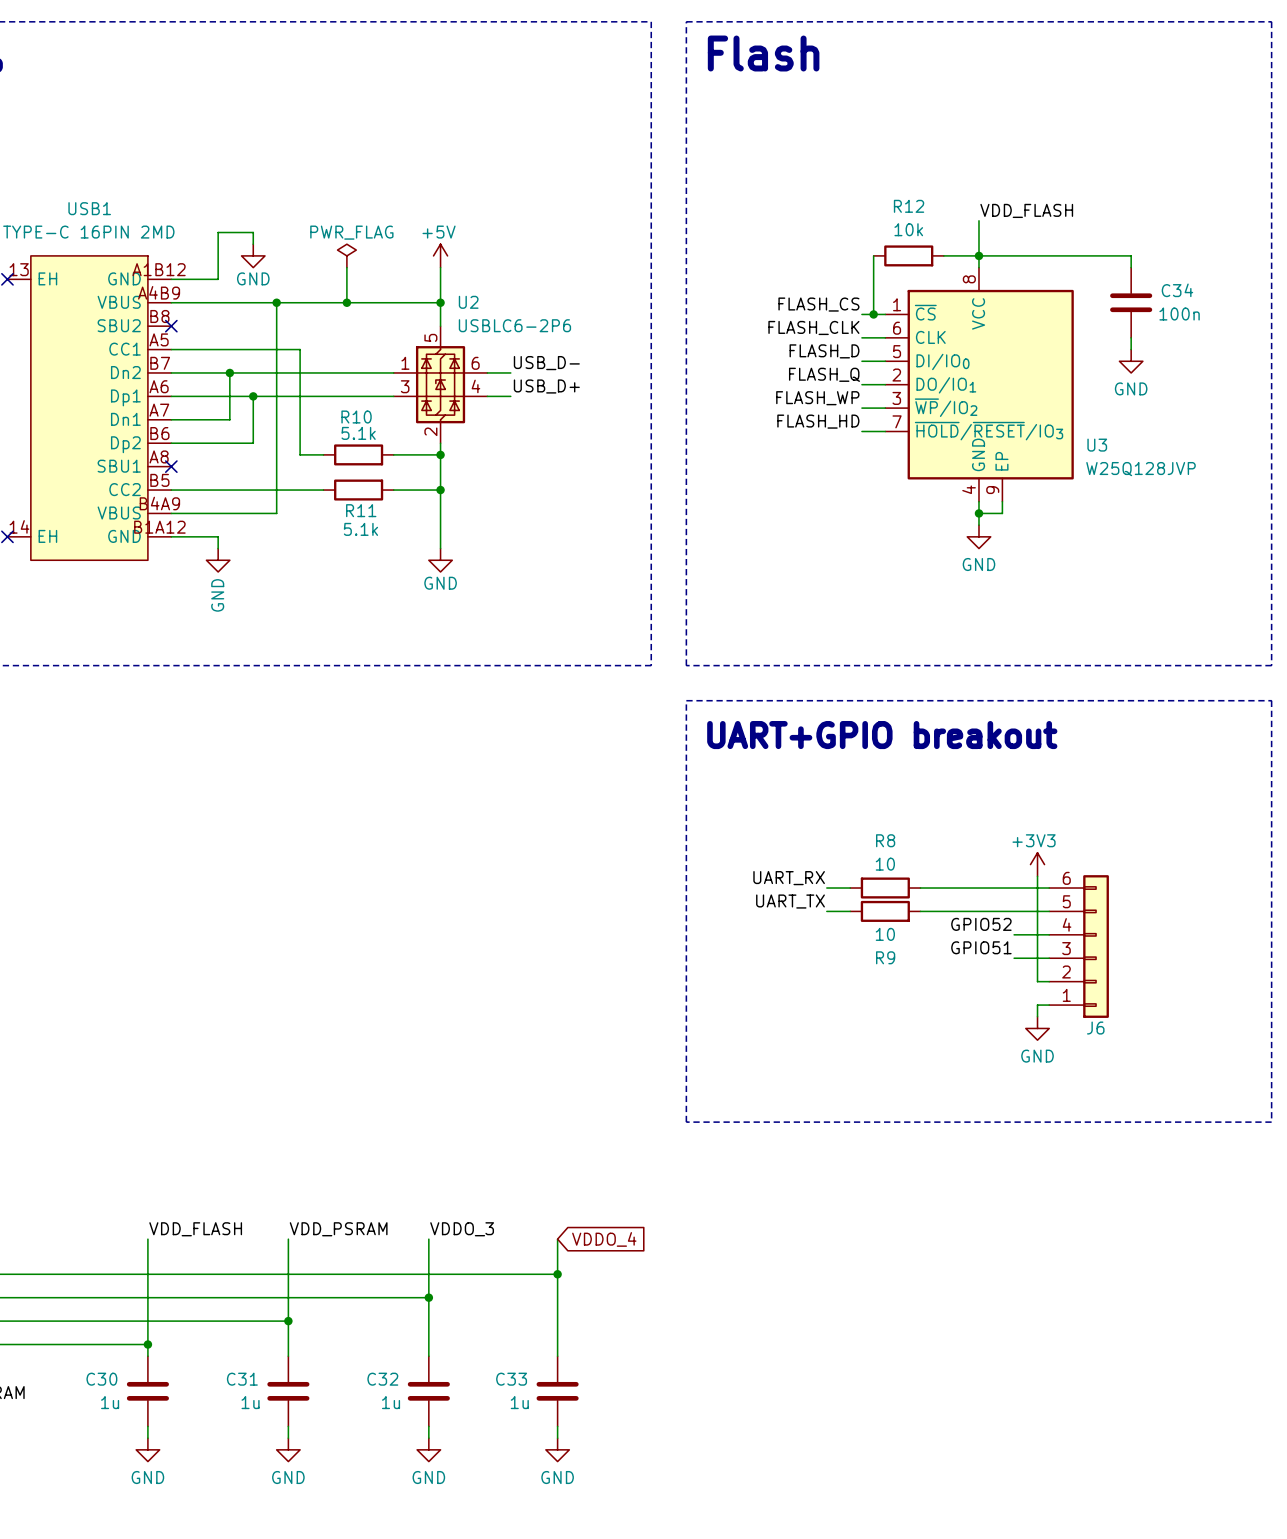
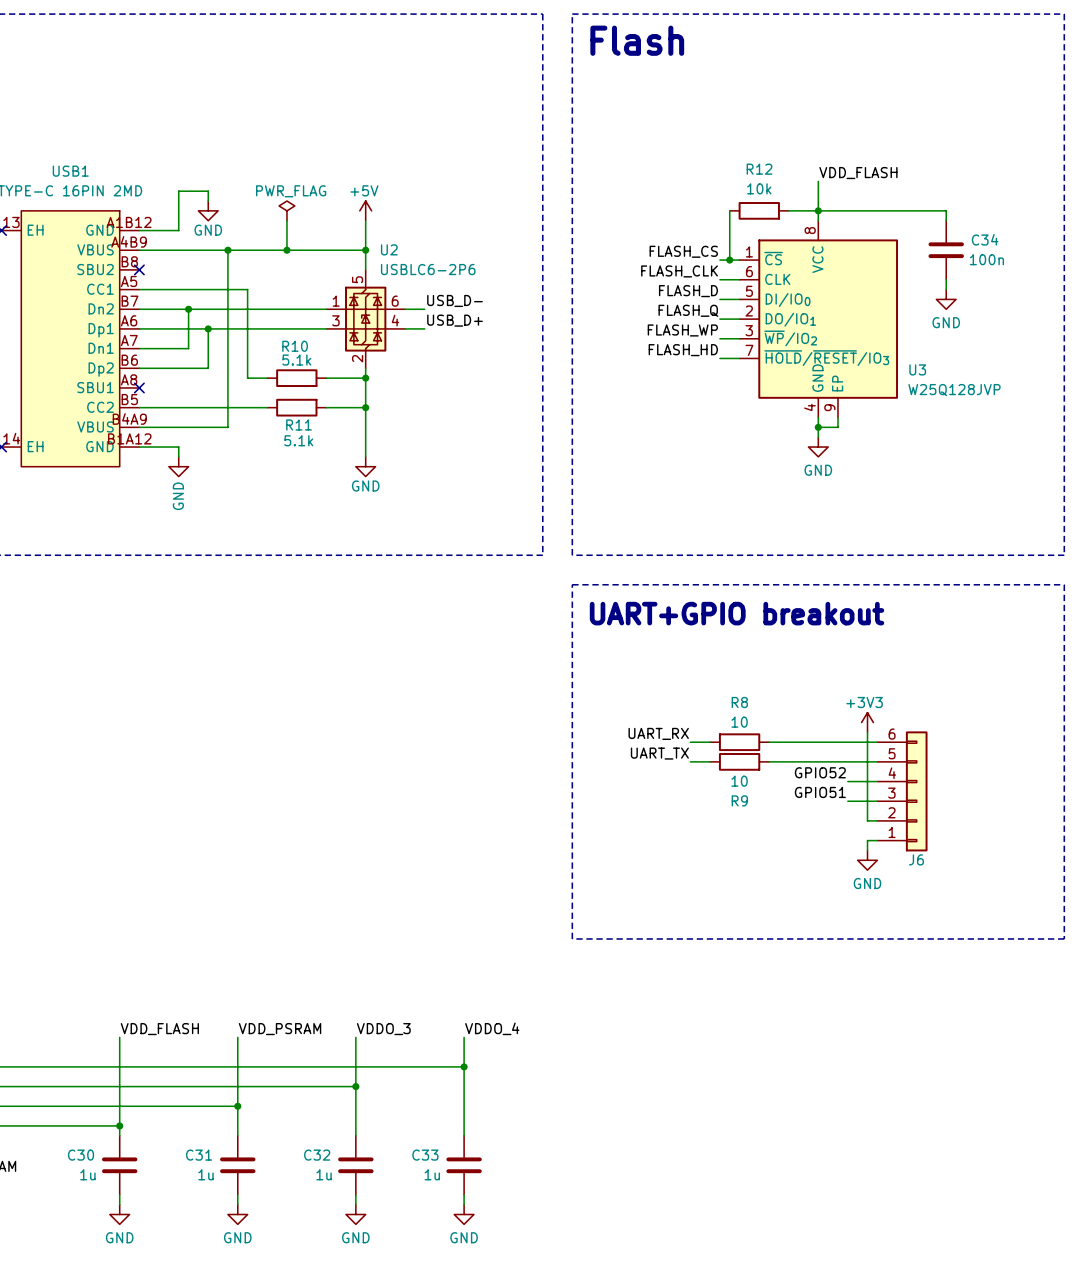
label: none -> VDDO_4 (492, 1028)
global label: VDDO_4 (604, 1239) -> none

